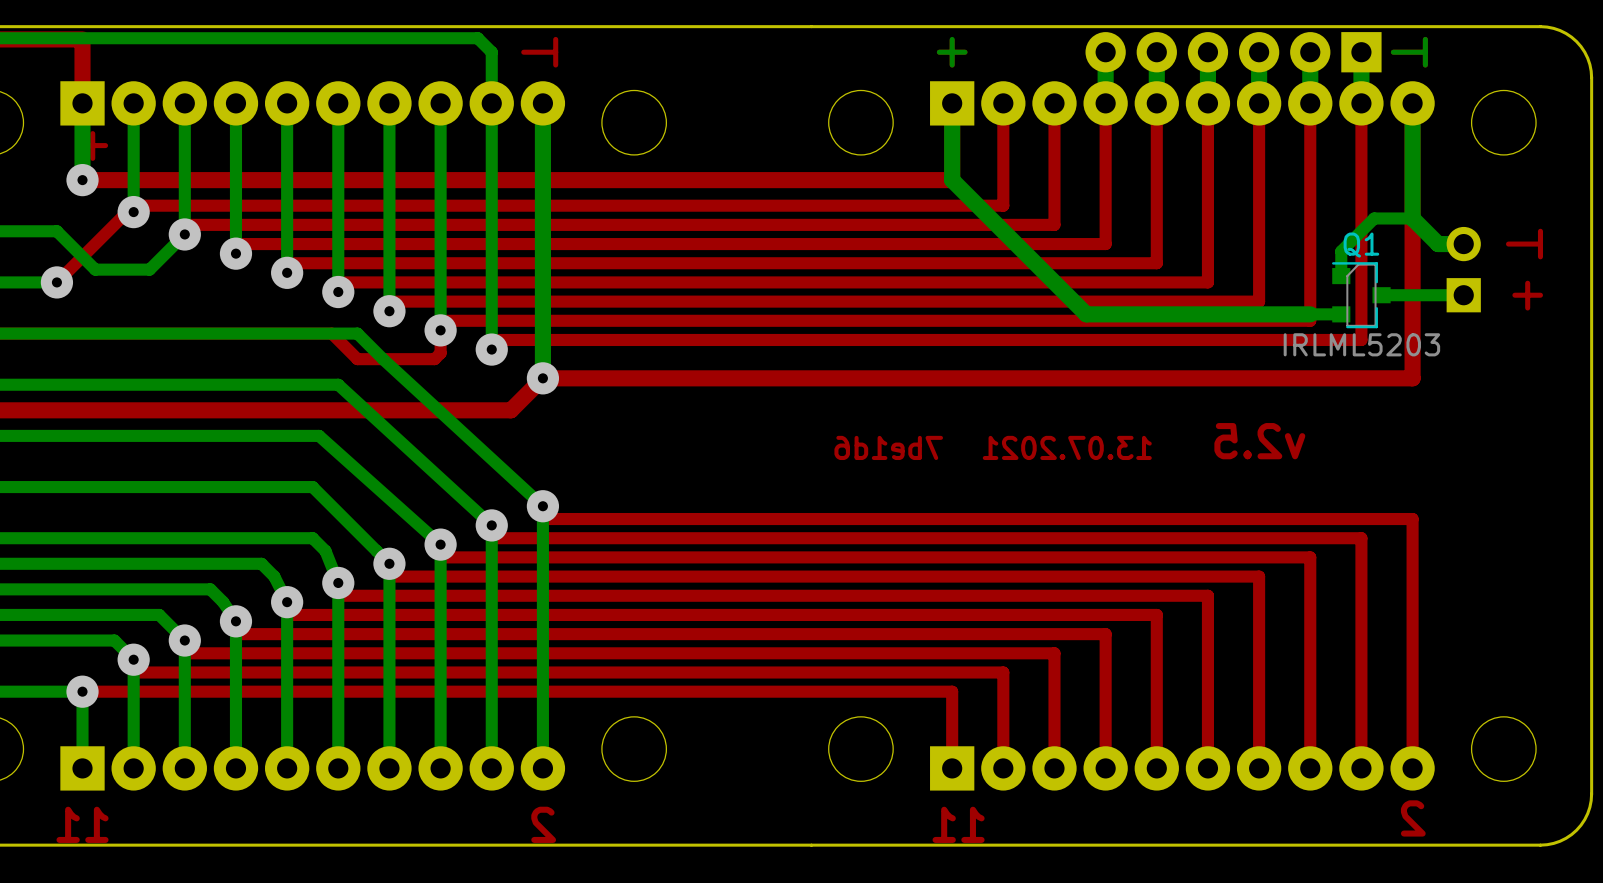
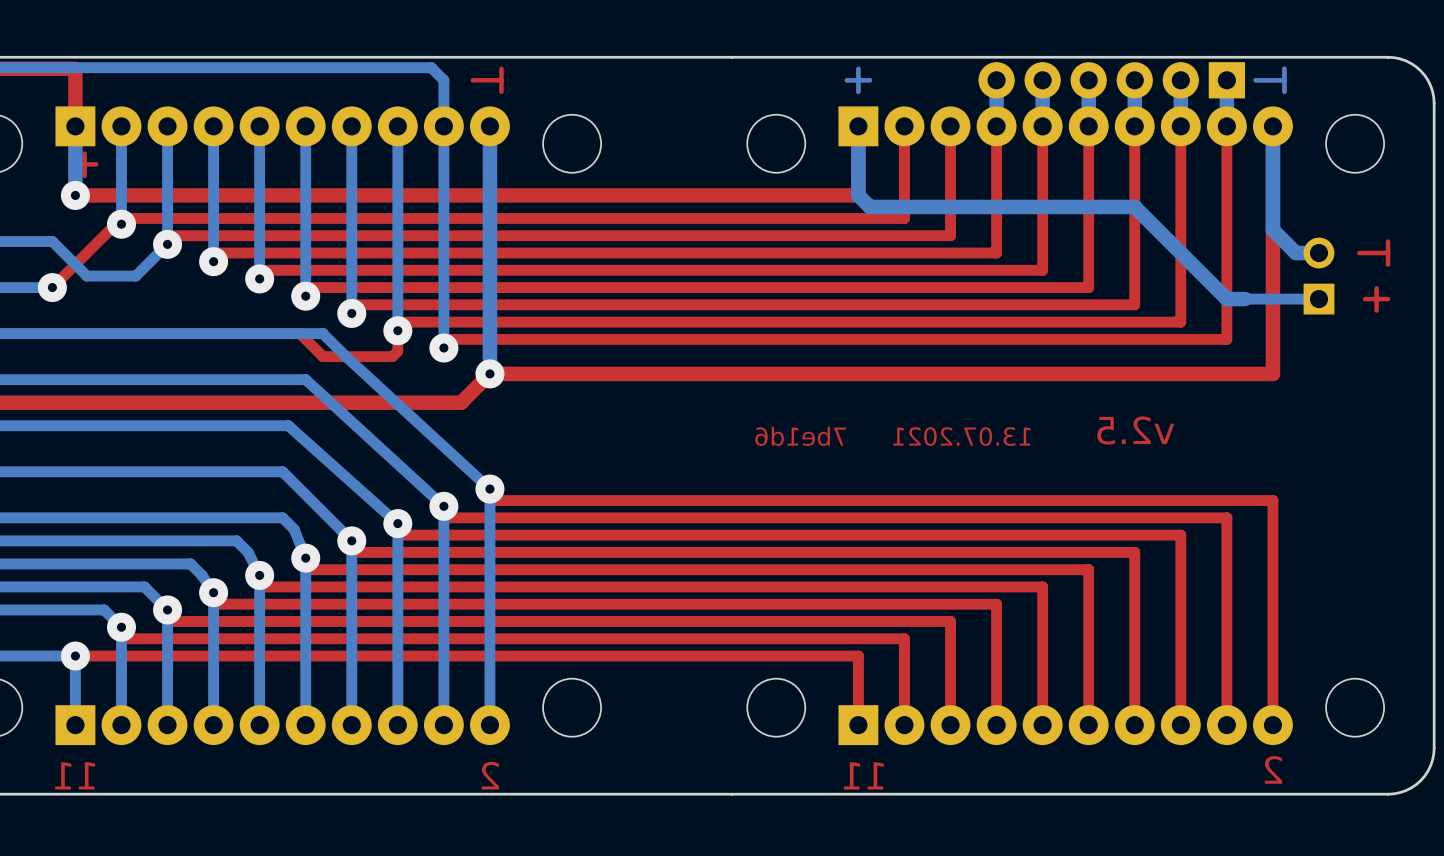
bottom track: (964, 192) (1086, 314) (1341, 314) -> (869, 206) (1134, 206) (1226, 299) (1245, 299)
bottom track: (1412, 218) (1374, 218) (1341, 251) (1341, 276) -> none
Q1: IRLML5203 (1361, 295) -> none

